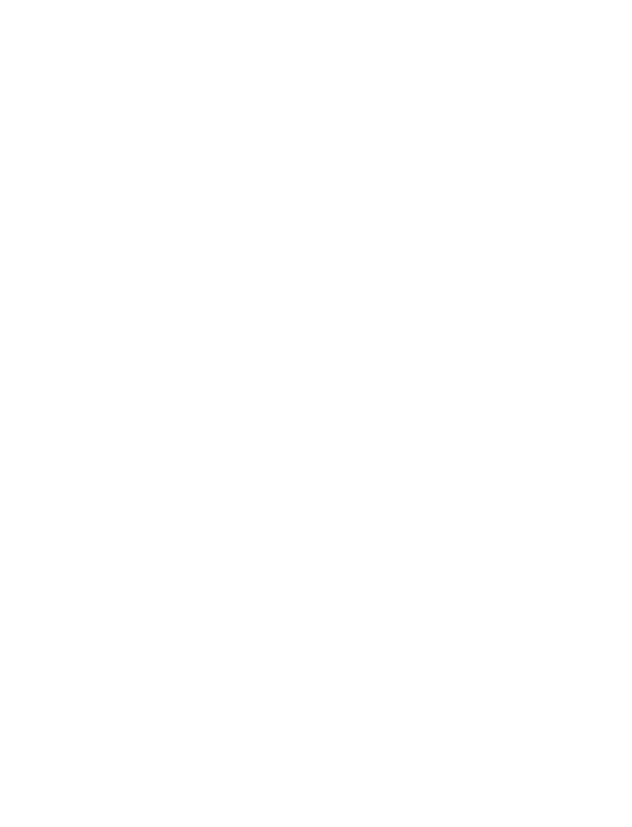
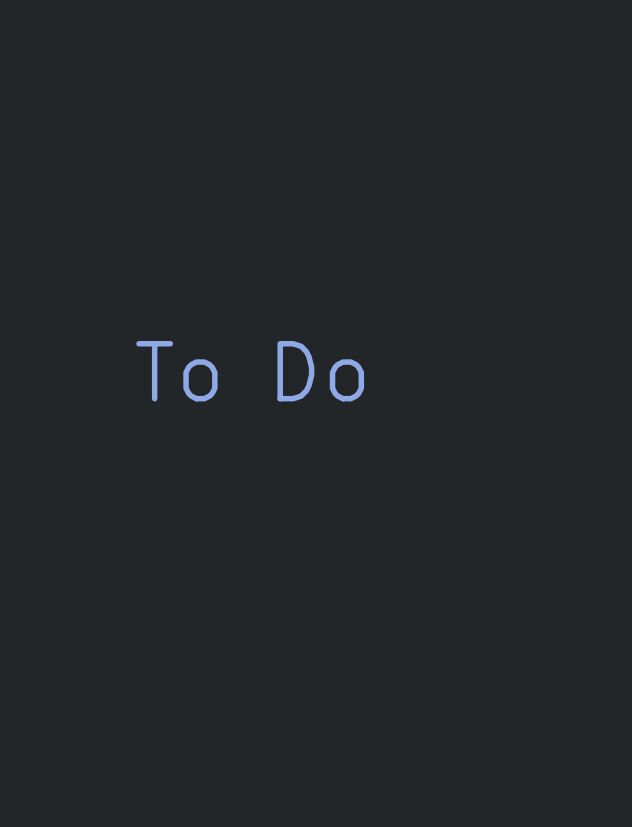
text: none -> To Do (250, 371)

